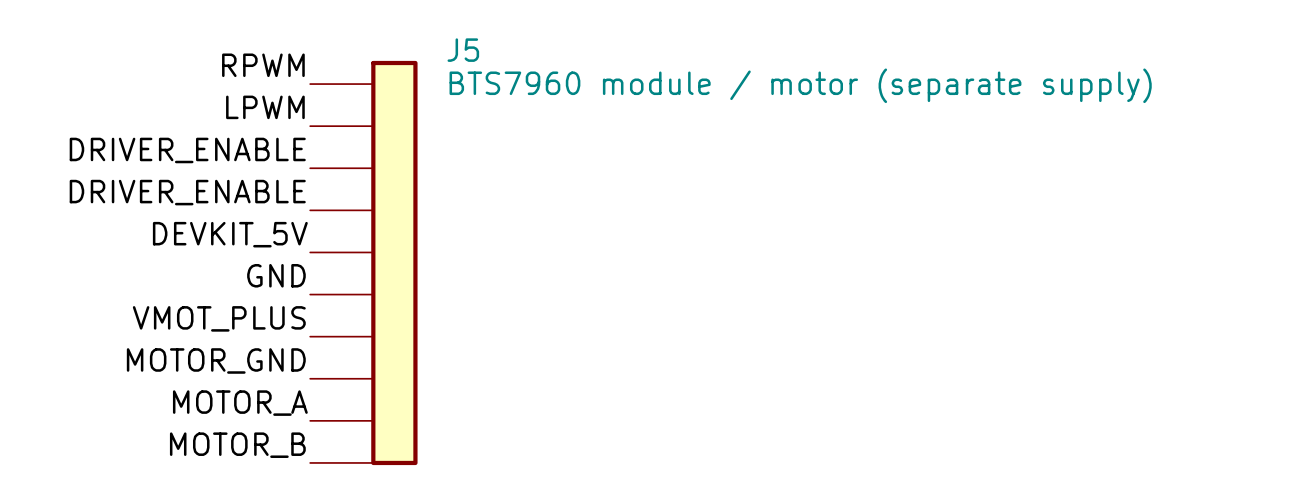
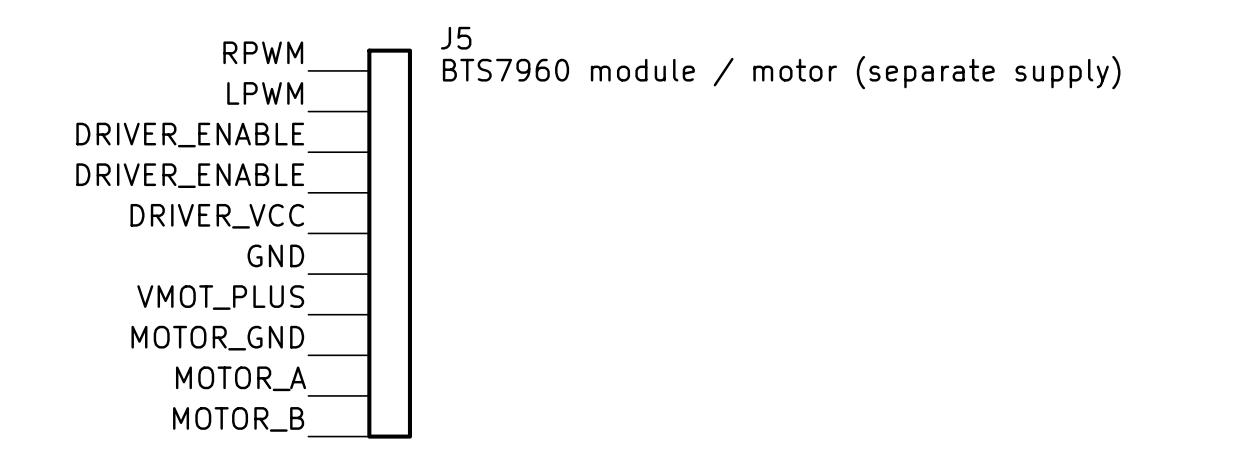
label: DEVKIT_5V (230, 234) -> DRIVER_VCC (217, 216)

